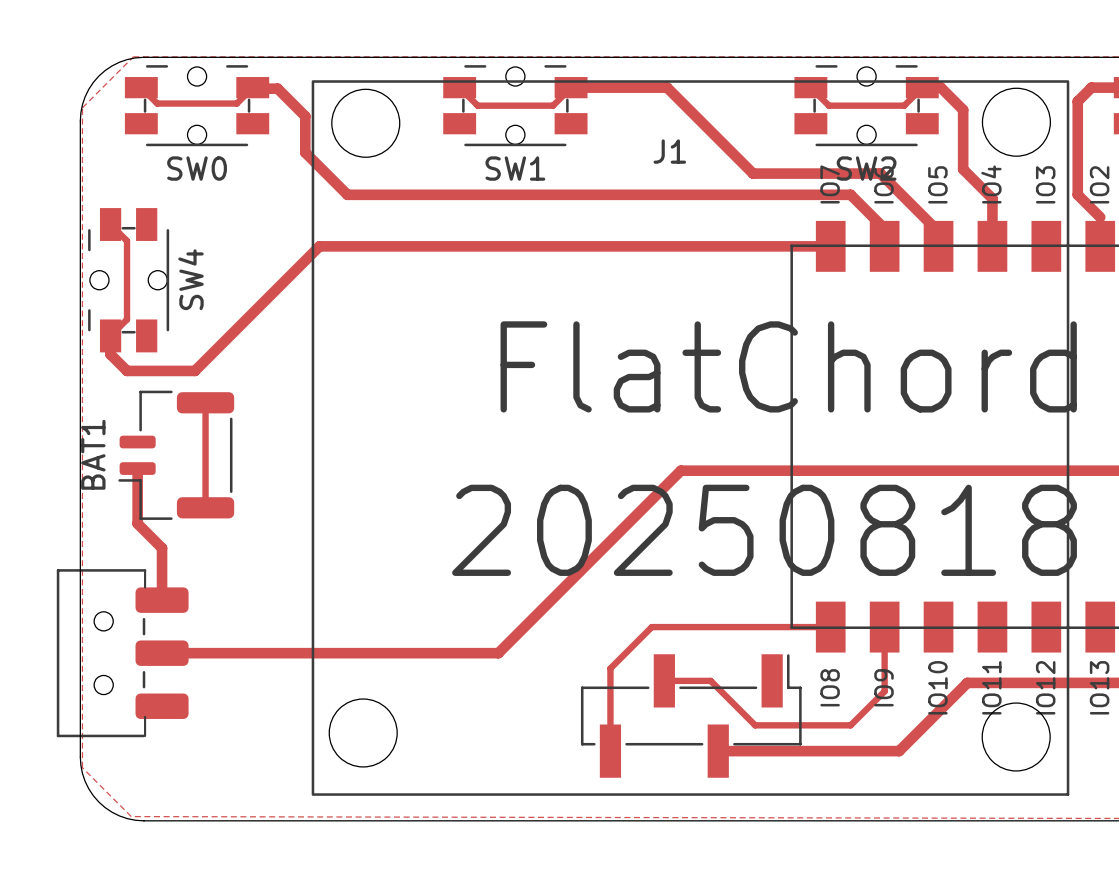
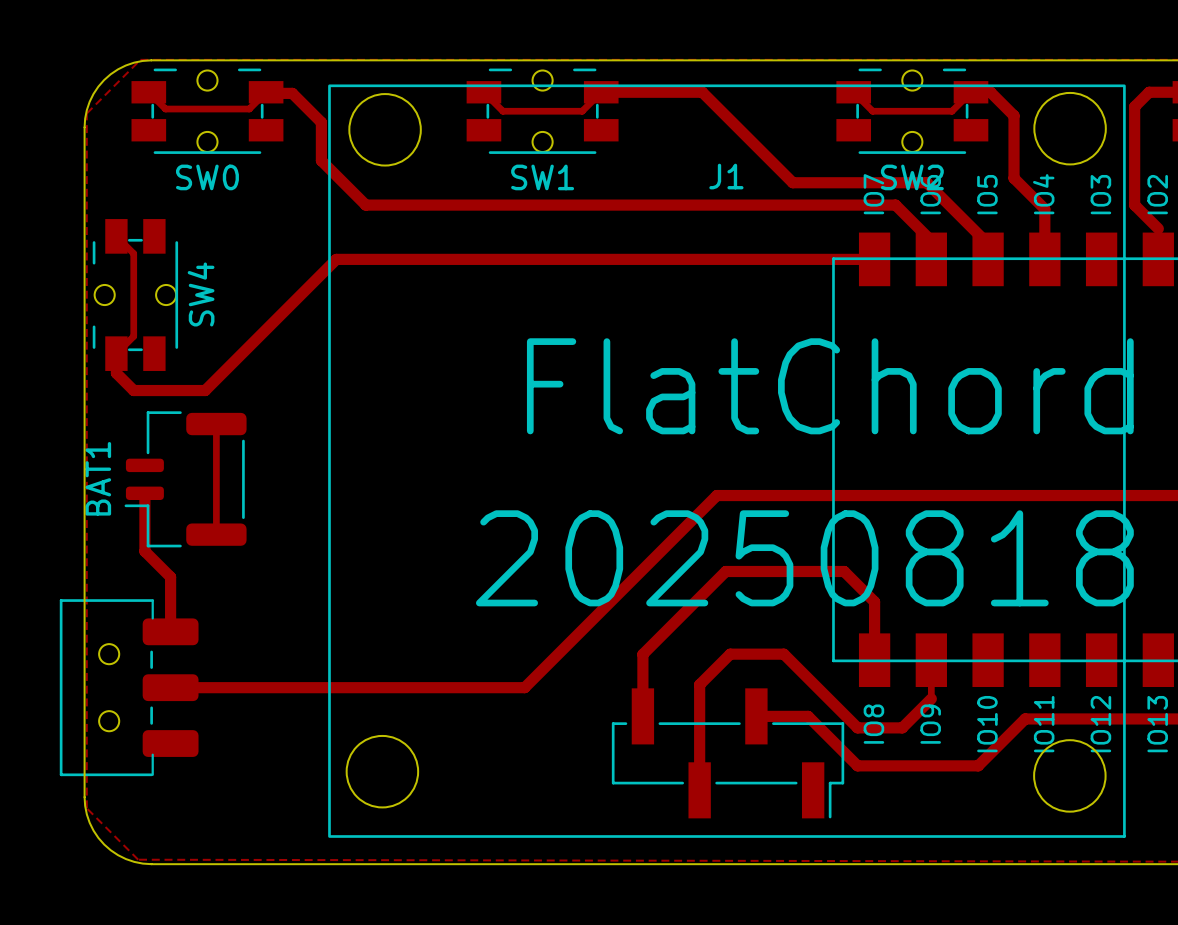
J1 footprint: [311, 80, 1070, 796] -> [328, 84, 1126, 838]
top track: (830, 627) (651, 627) (610, 668) (610, 751) -> (874, 660) (874, 601) (844, 571) (725, 571) (642, 654) (642, 716)
top track: (884, 663) (884, 691) (850, 725) (755, 725) (710, 680) (664, 680) -> (931, 698) (902, 727) (857, 727) (783, 654) (730, 654) (699, 684) (699, 790)
top track: (973, 682) (967, 682) (899, 751) (718, 751) -> (1025, 718) (978, 765) (857, 765) (808, 716) (756, 716)

